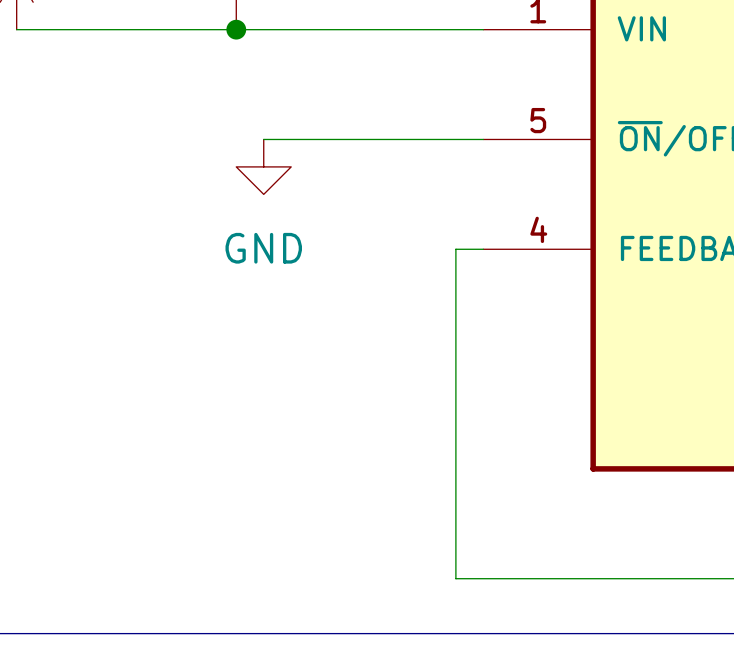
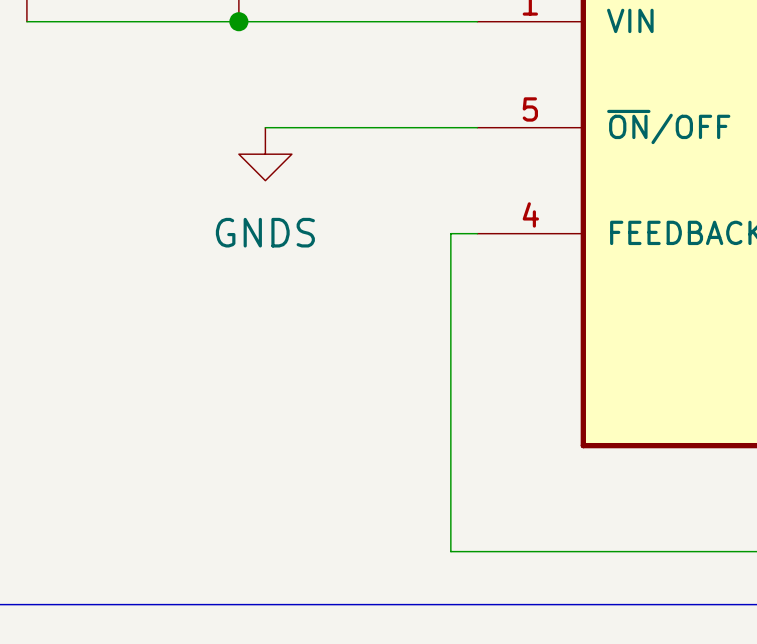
power symbol: GND (263, 166) -> GNDS (265, 154)

